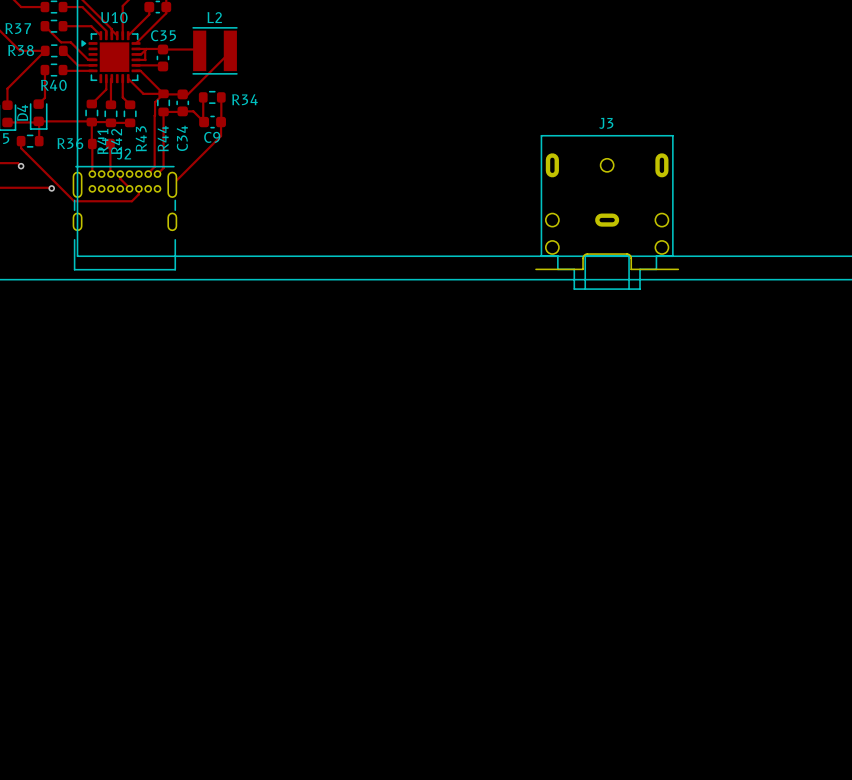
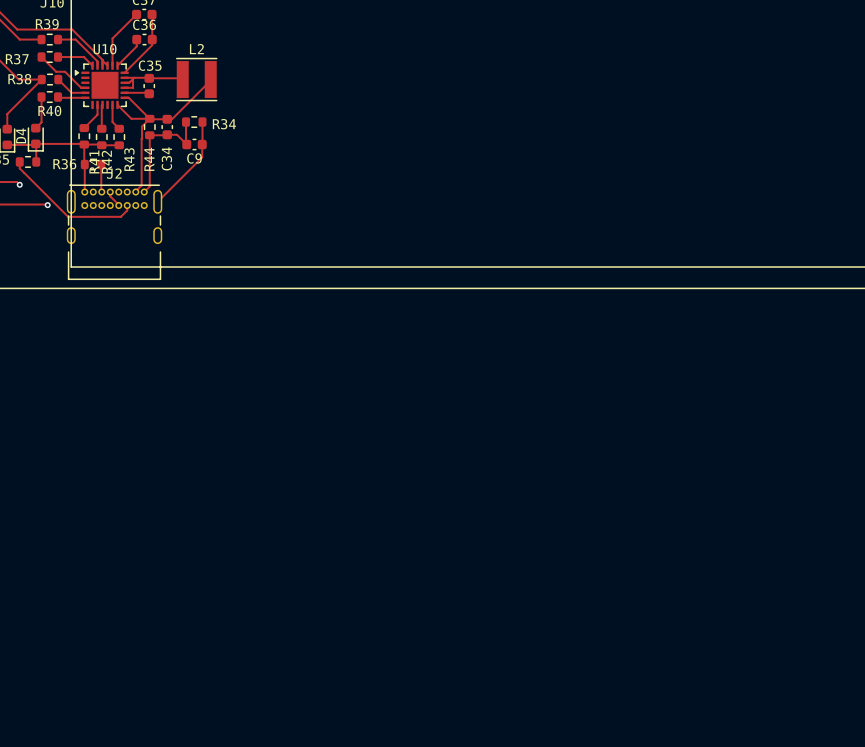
J3: (607, 212) -> none

